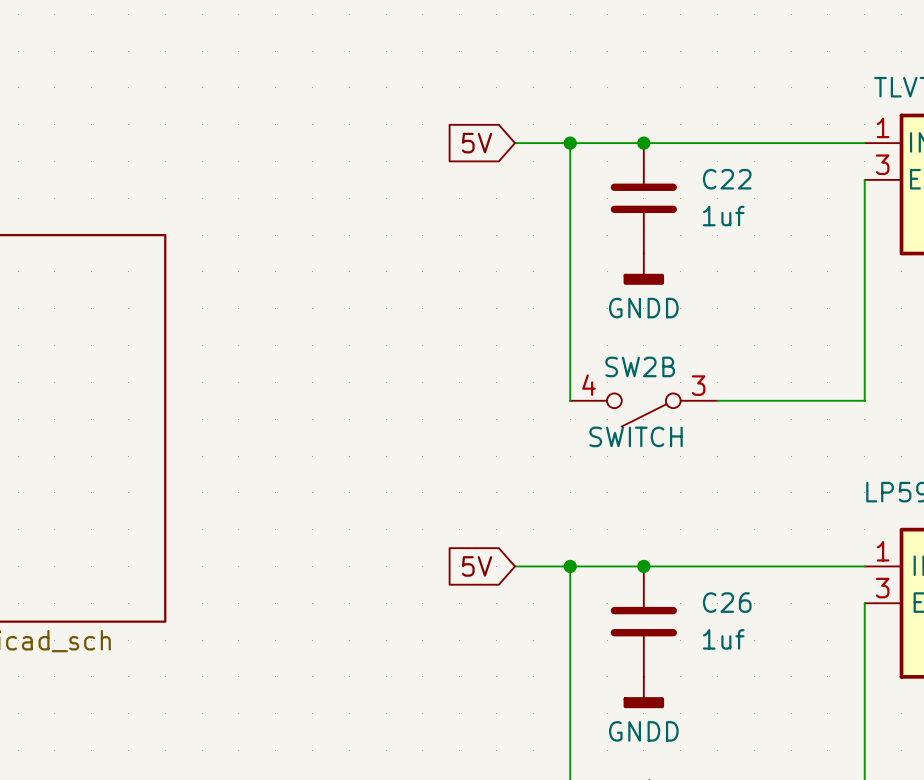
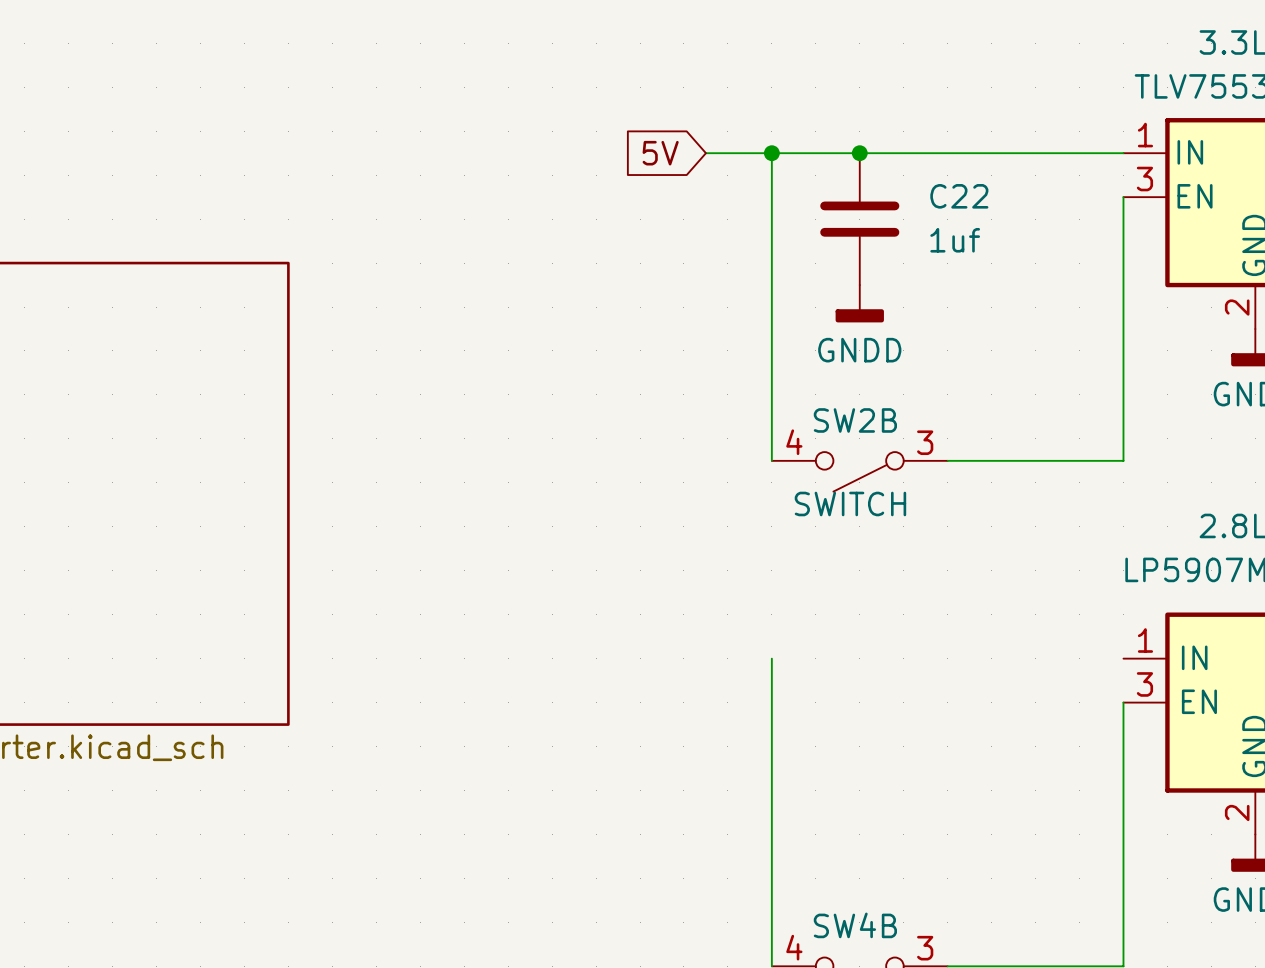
global label: 5V (477, 566) -> none
wire: (514, 566) (864, 566) -> none
junction: (570, 566) -> none
junction: (643, 566) -> none
C26: 1uf (643, 621) -> none
power symbol: GNDD (643, 692) -> none

